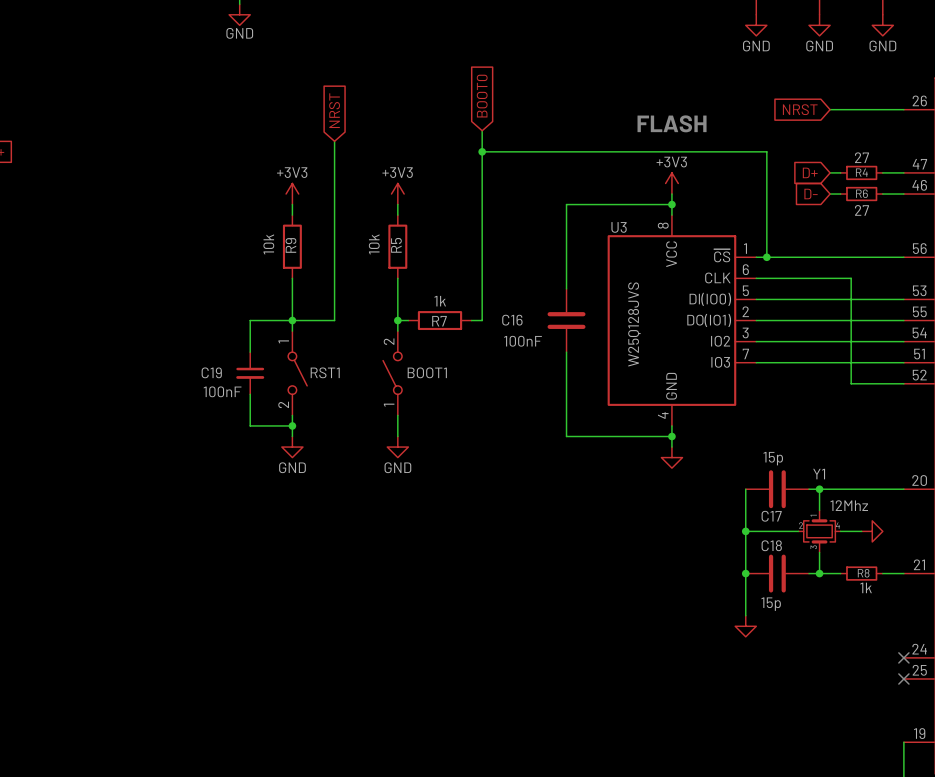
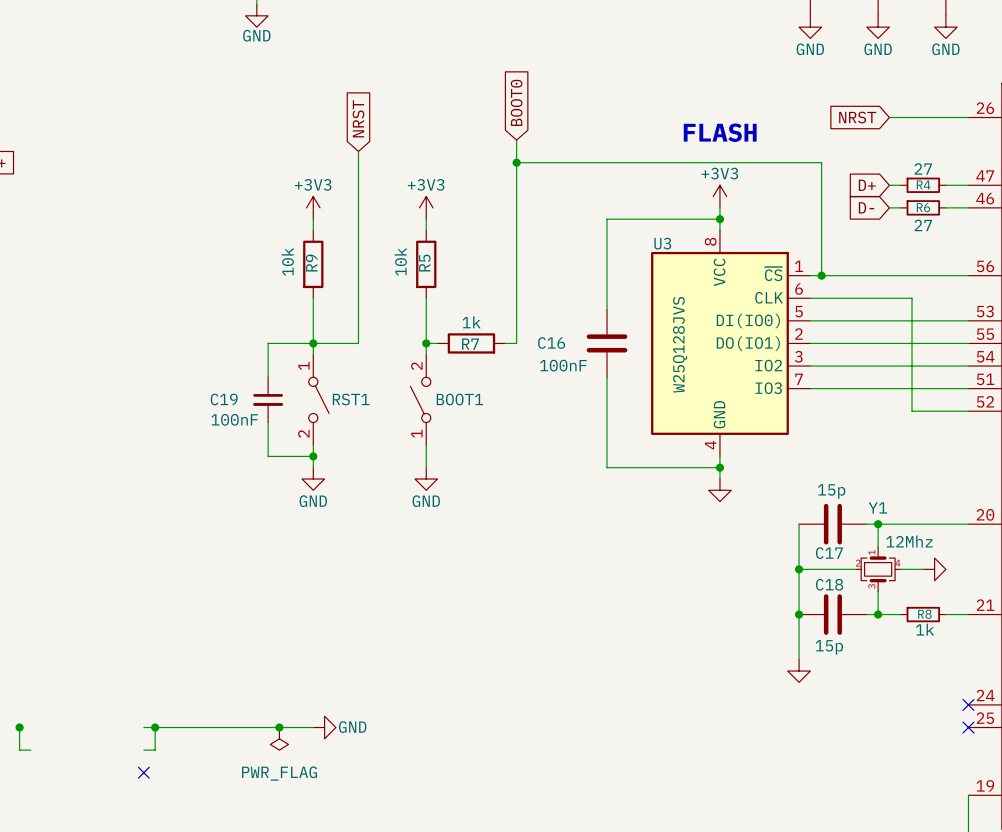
wire: none -> (19, 727) (19, 750) (30, 750)
junction: none -> (19, 727)
wire: none -> (143, 727) (313, 727)
wire: none -> (155, 727) (155, 750) (143, 750)
junction: none -> (155, 727)
junction: none -> (279, 727)
power symbol: none -> GND (324, 727)
power symbol: none -> PWR_FLAG (279, 738)
no-connect mark: none -> (143, 772)

